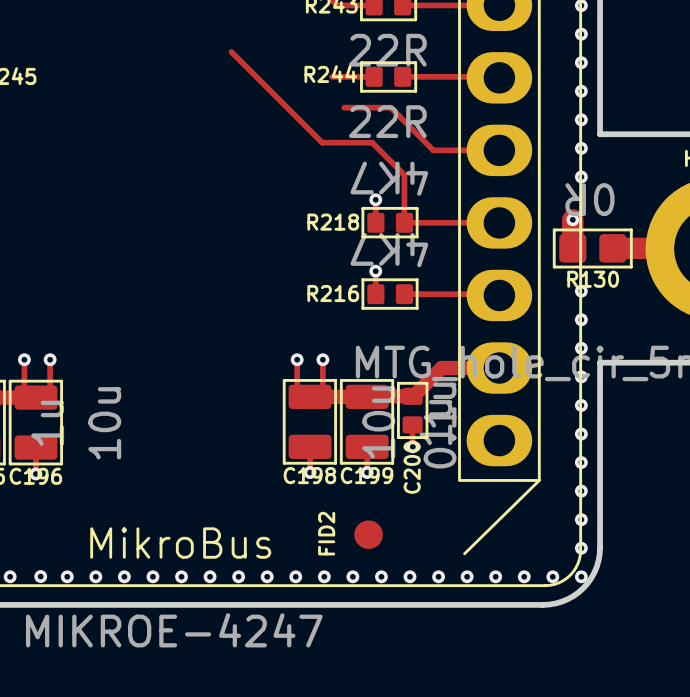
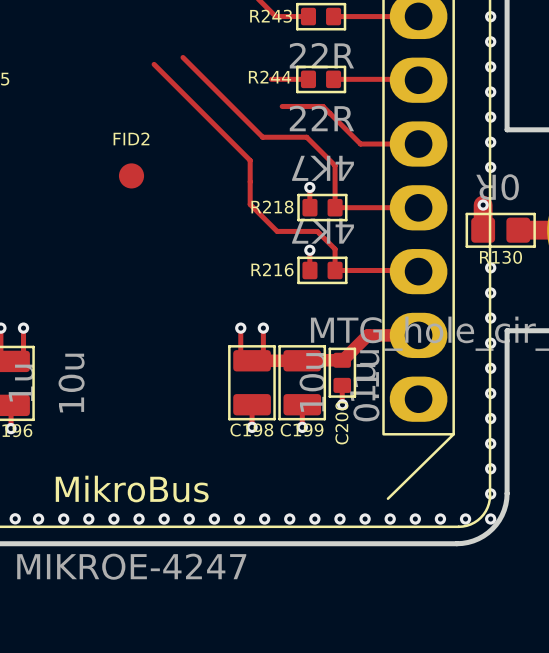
top track: none -> (154, 64) (250, 160) (250, 204) (277, 231) (317, 231) (335, 249) (335, 270)
FID2 name rotation: 0° (326, 533) -> 90° clockwise (131, 138)
FID2 position: (368, 534) -> (131, 175)

